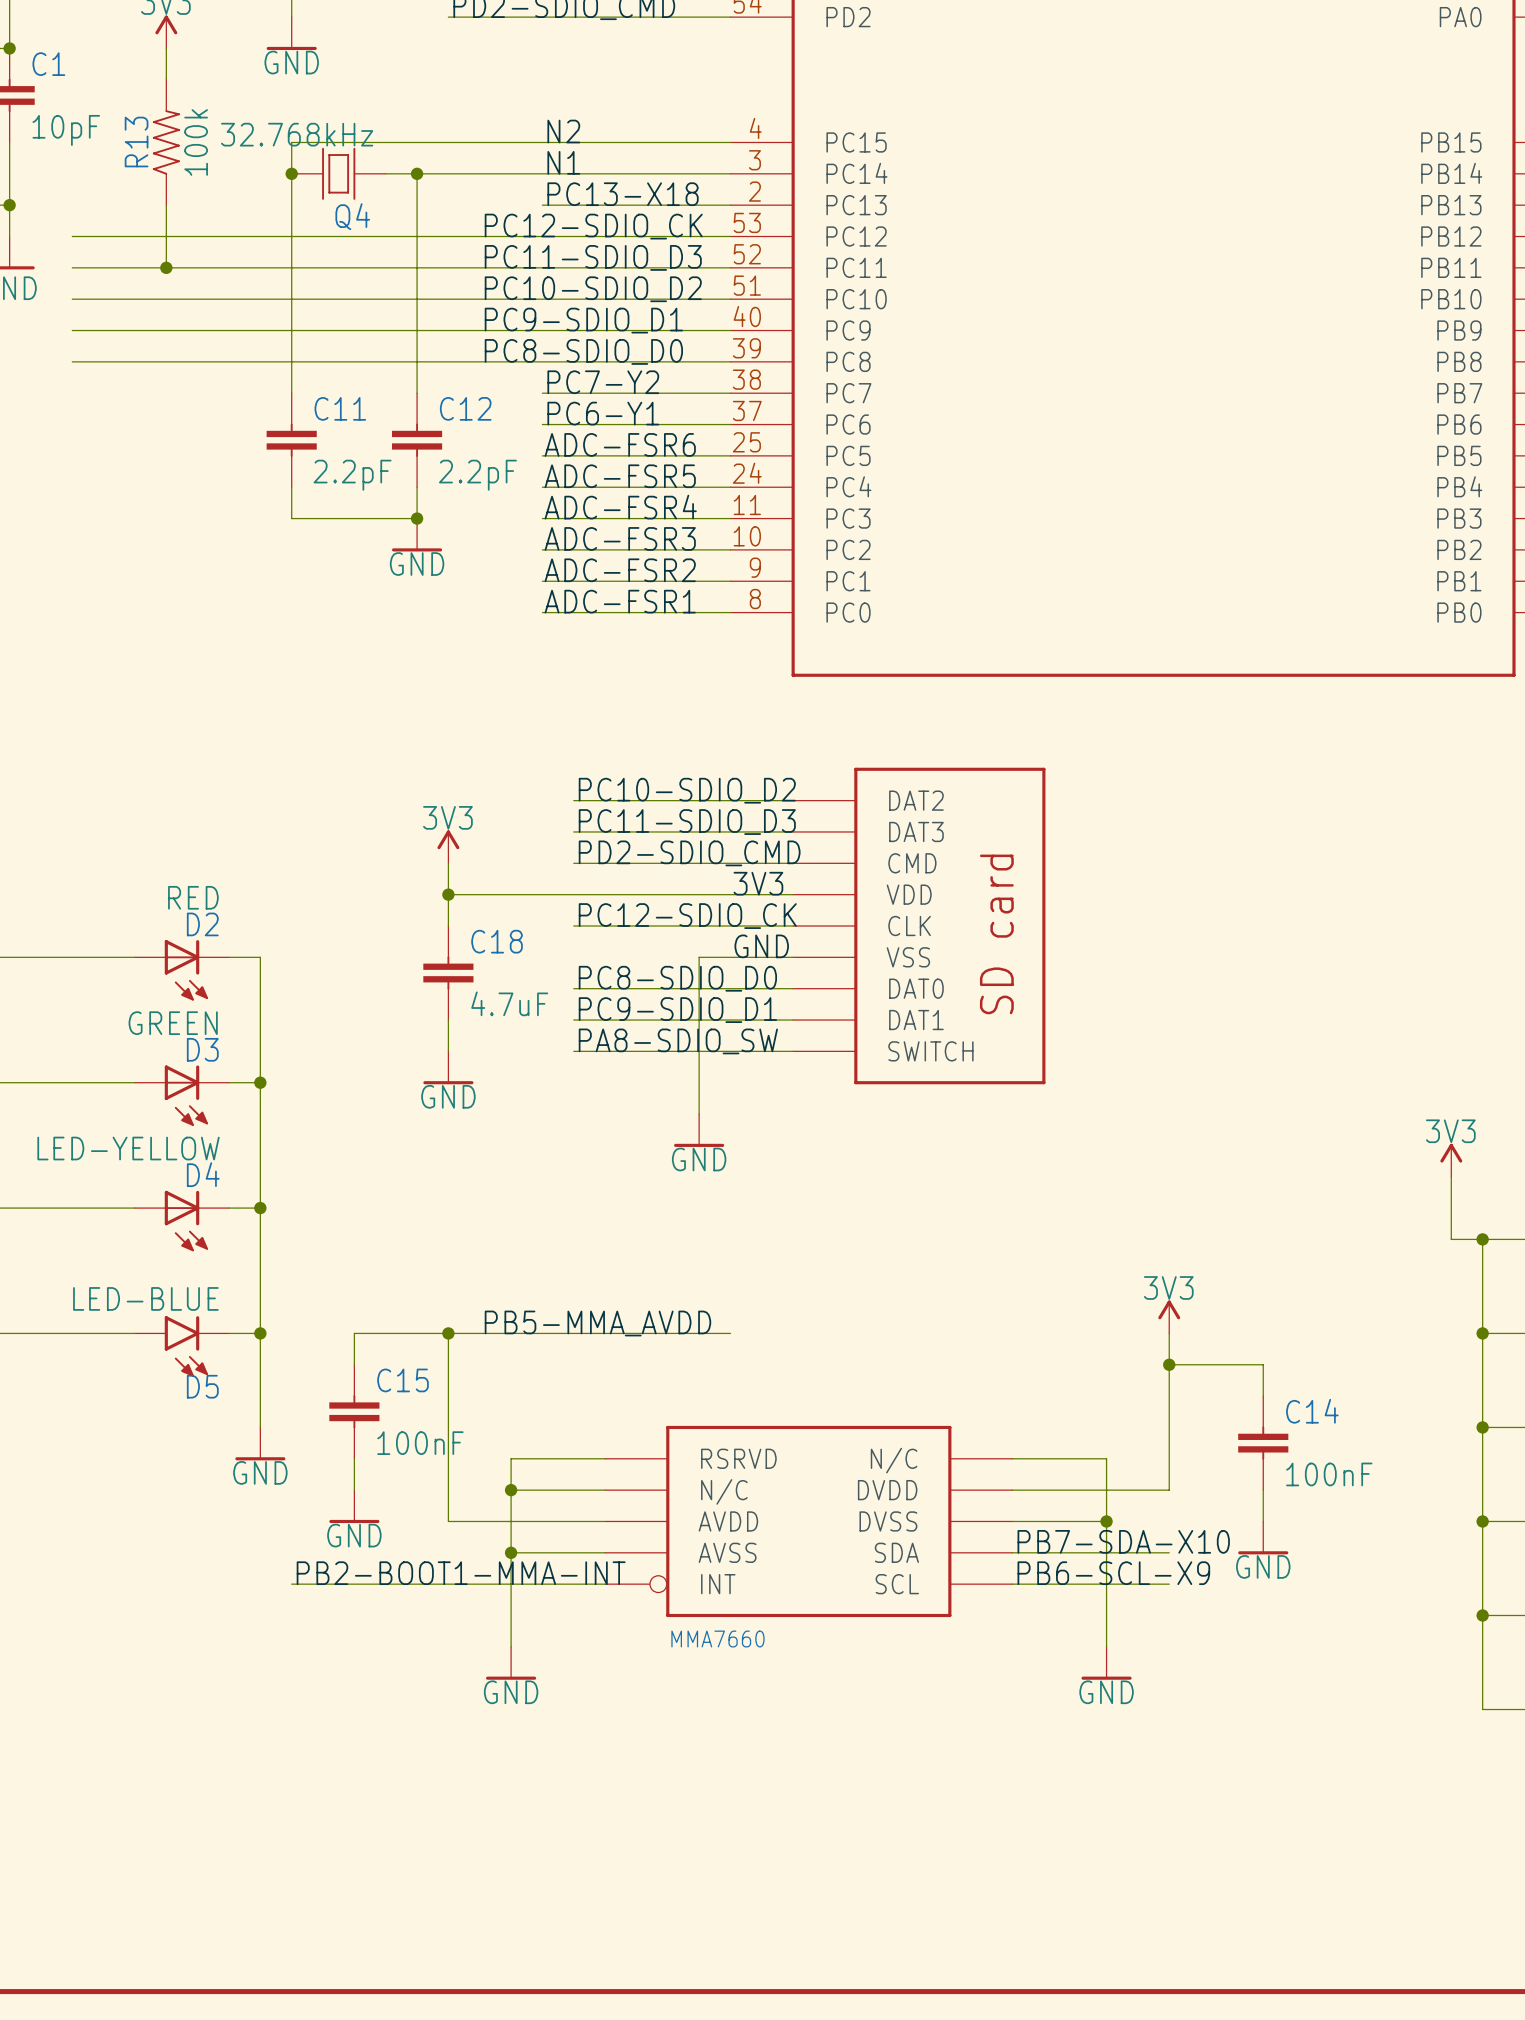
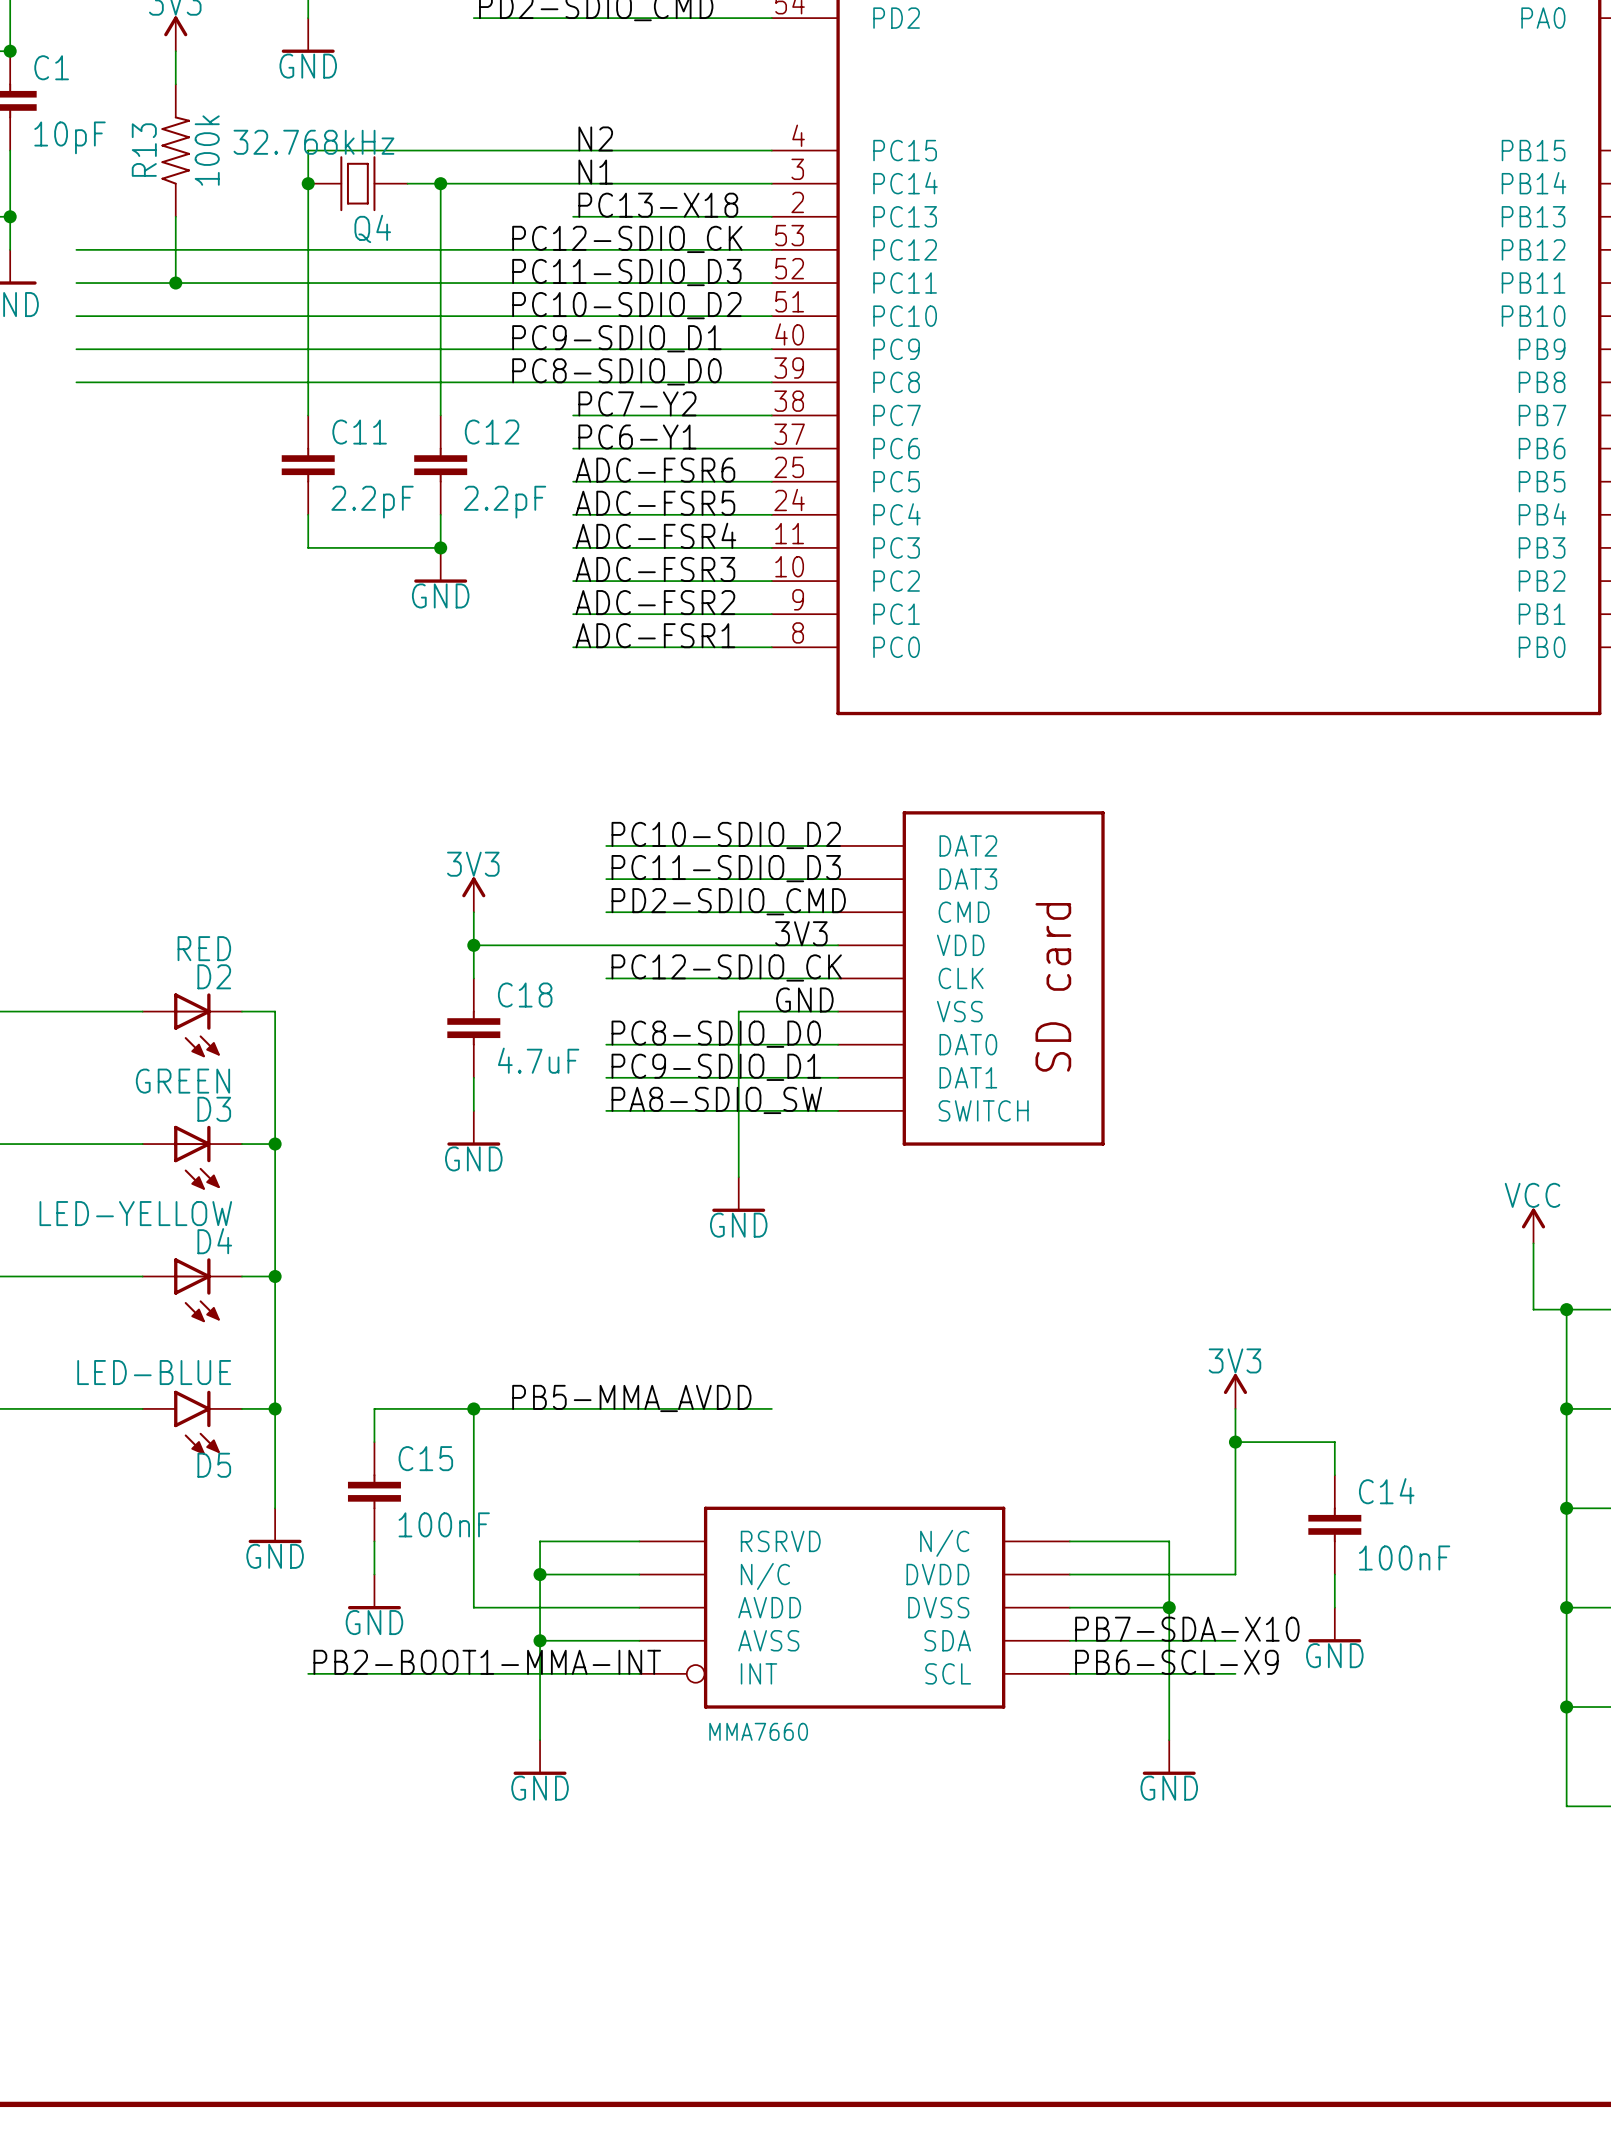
power symbol: 3V3 (1451, 1160) -> VCC (1533, 1225)

